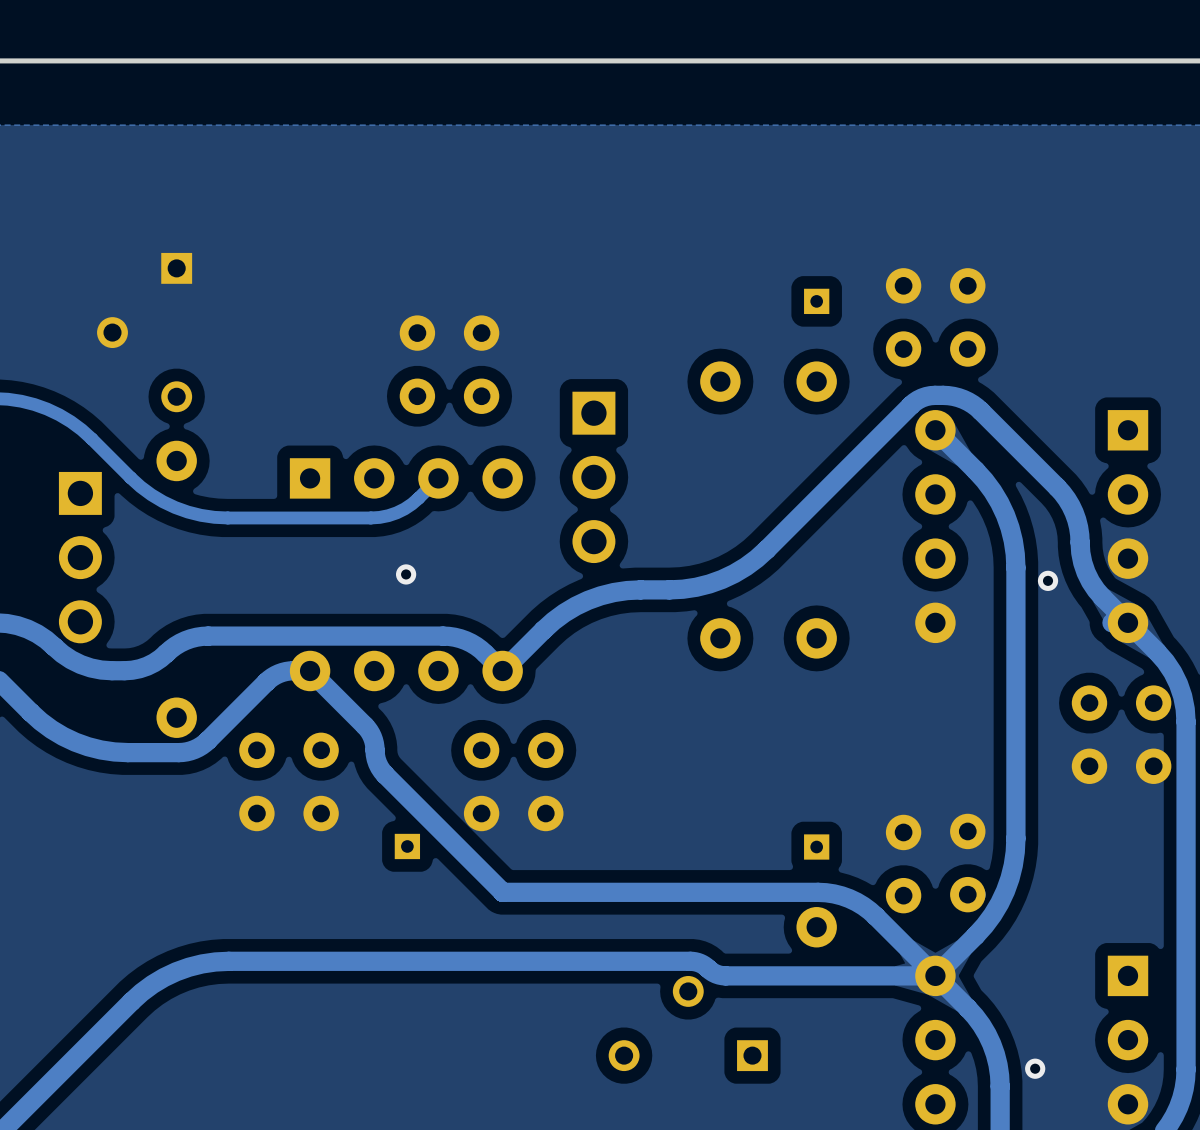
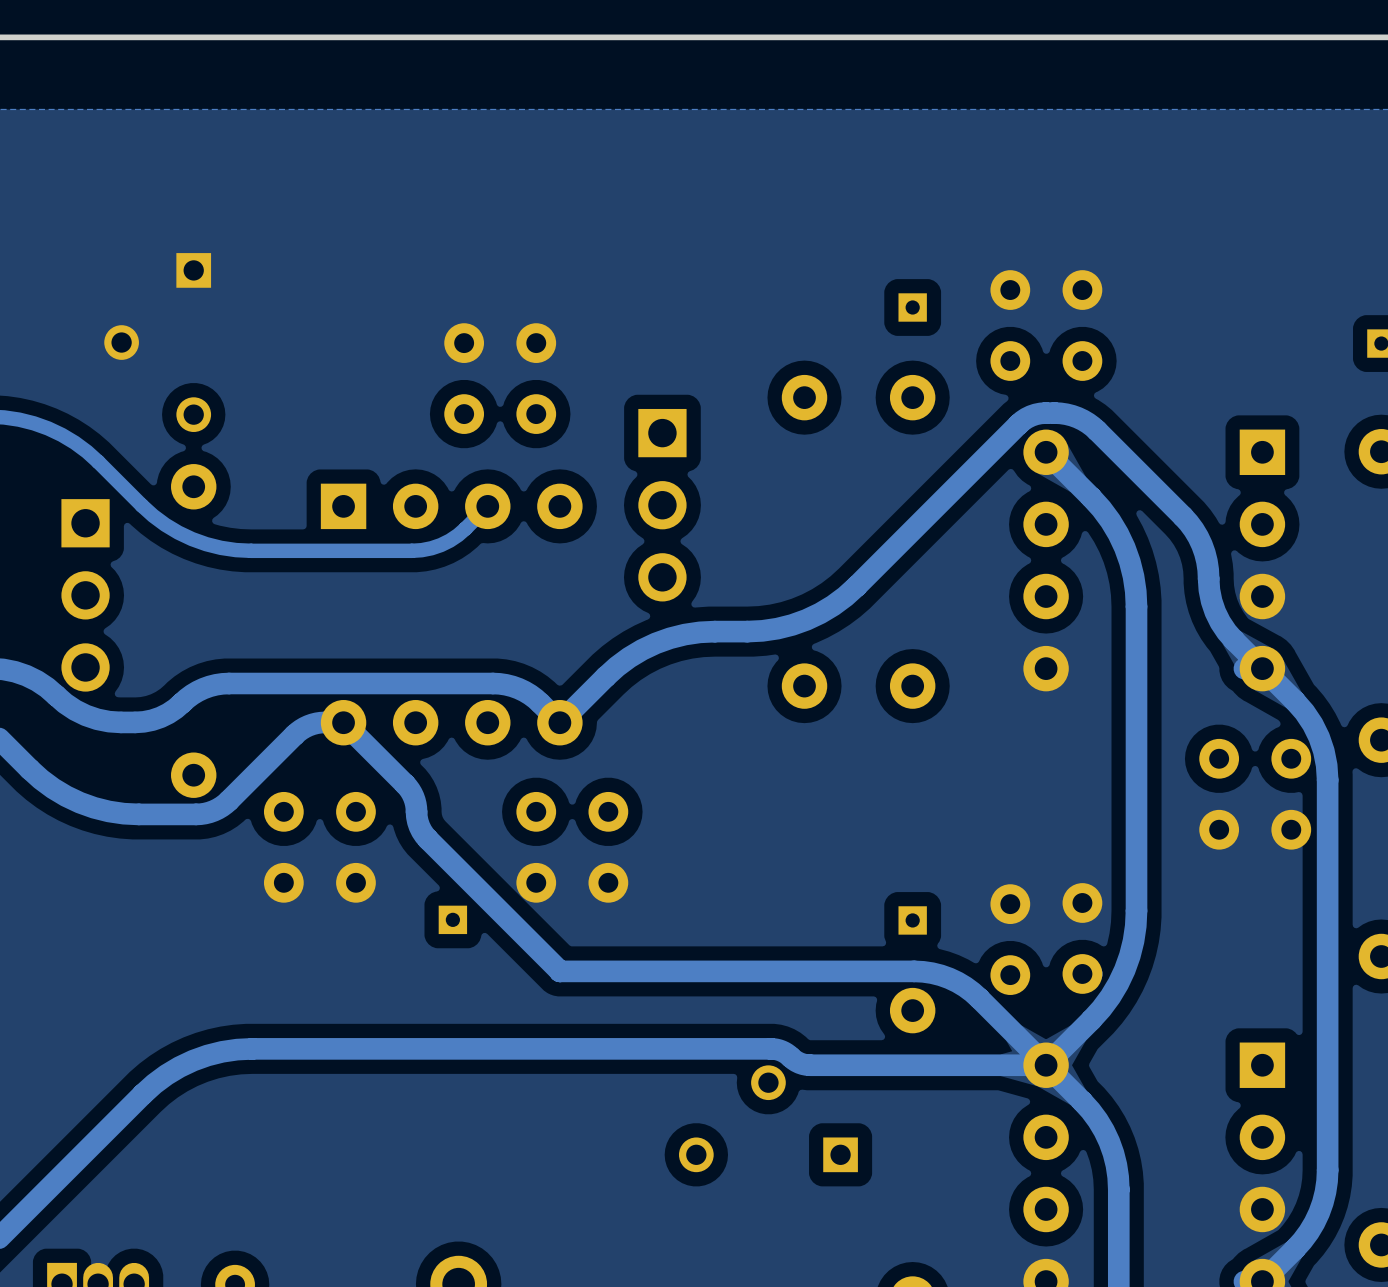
via: (406, 574) -> none
via: (1048, 580) -> none
via: (1035, 1068) -> none

